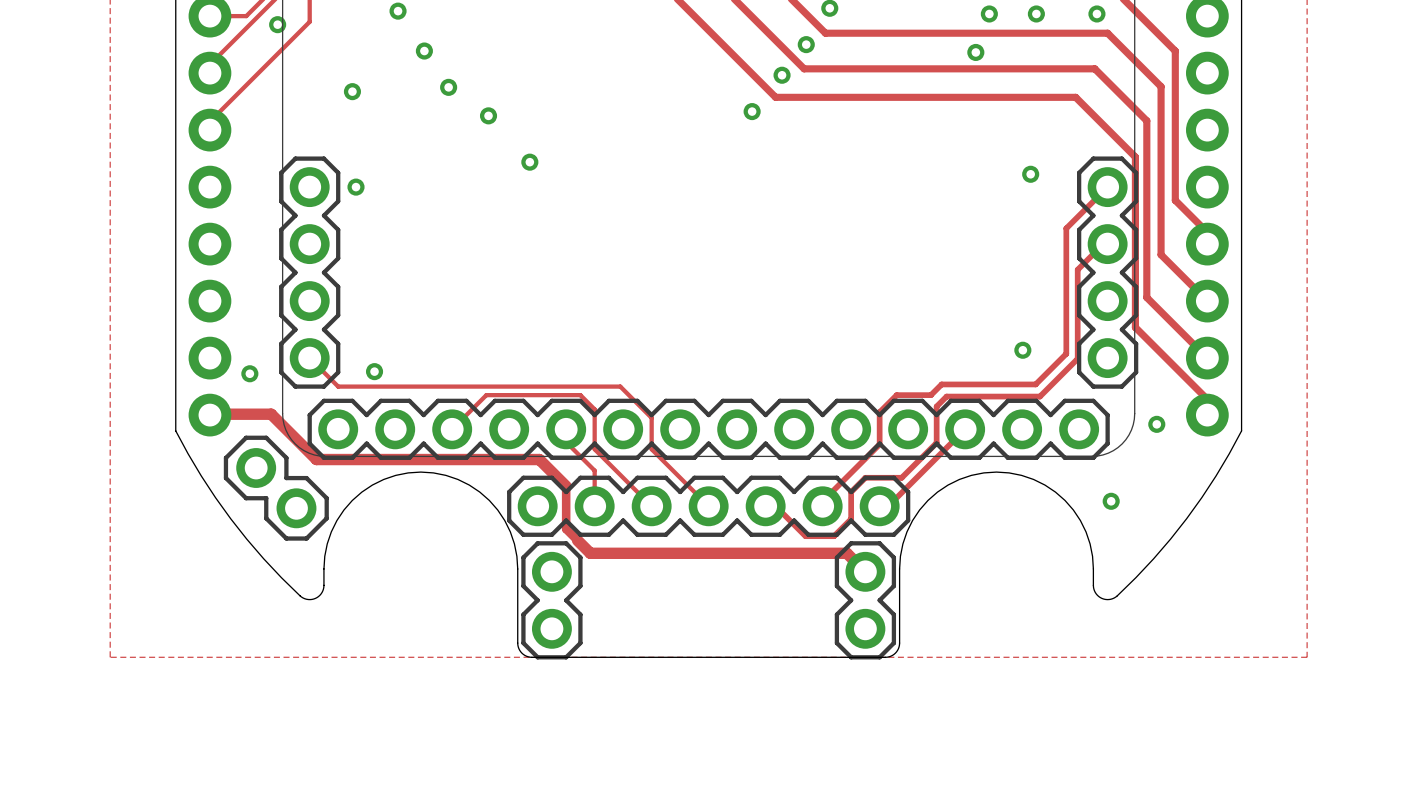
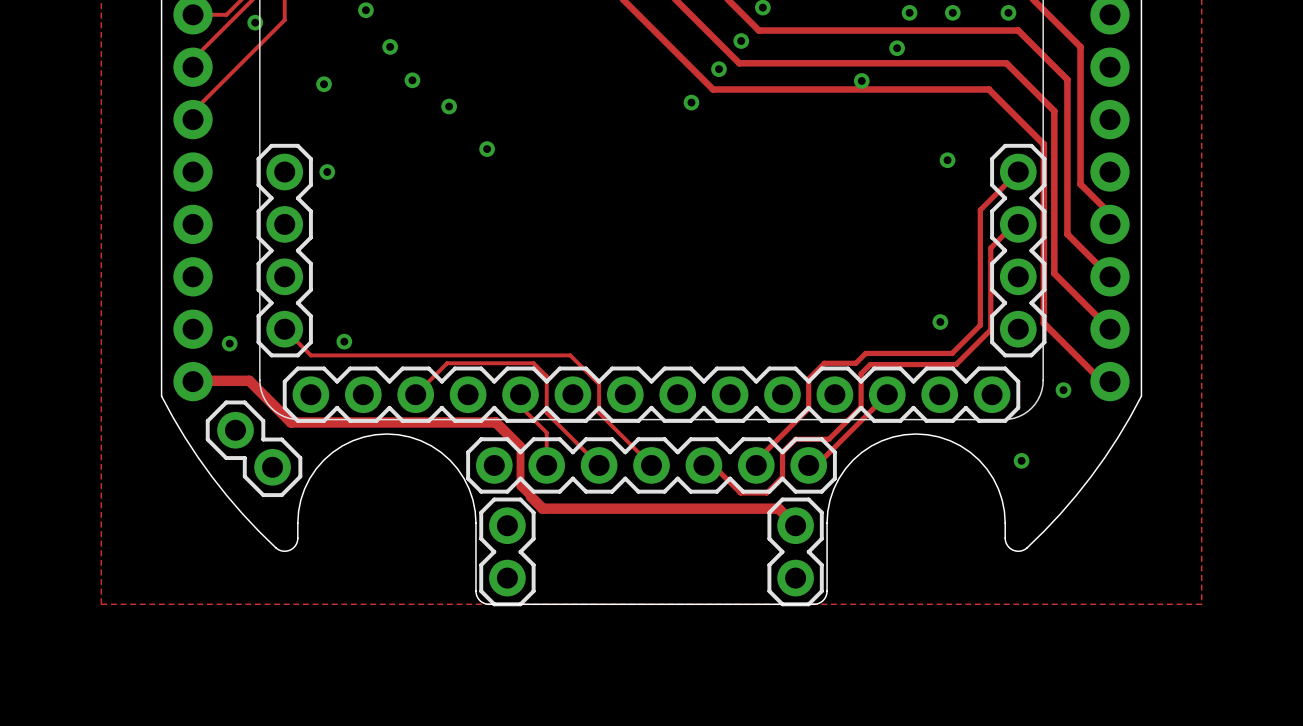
via: none -> (861, 80)
track: (1135, 327) (1207, 399) (1207, 415) -> (1043, 301) (1043, 323) (1102, 381)

